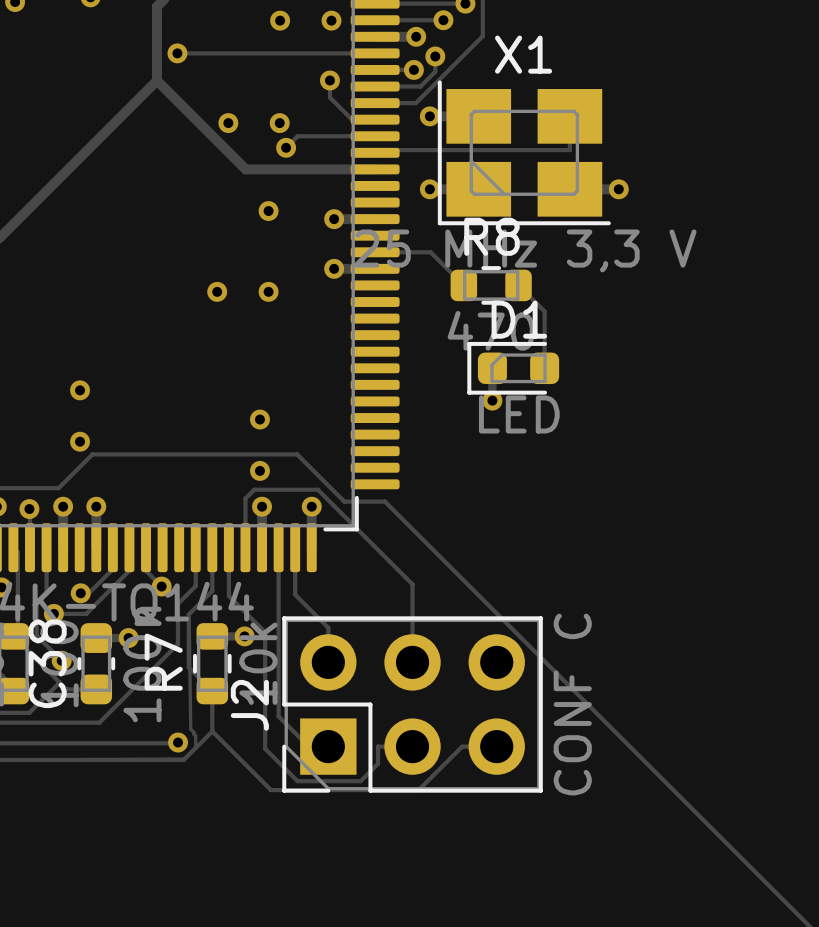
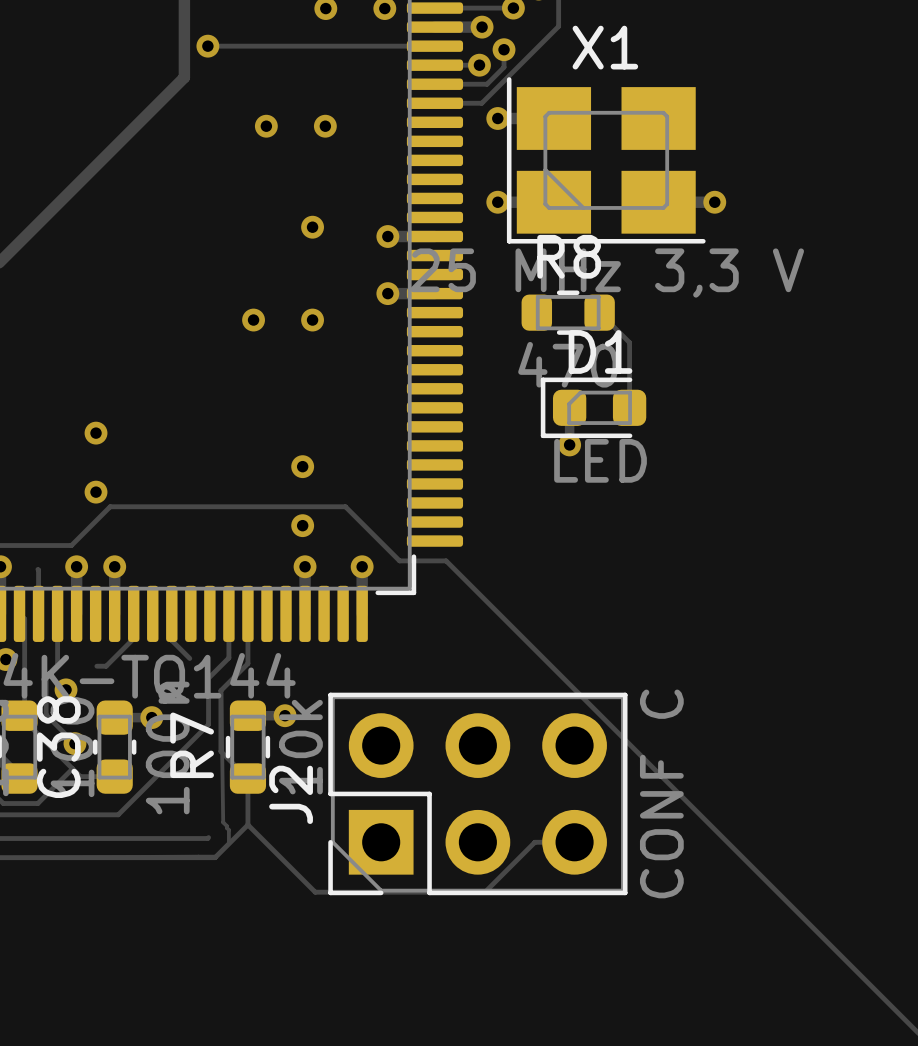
track: (156, 80) (245, 169) (375, 169) -> none
track: (329, 80) (329, 97) (352, 119) (375, 119) -> none
via: (329, 80) -> none
track: (569, 116) (569, 150) (377, 150) (375, 152) -> none
track: (375, 136) (297, 136) (286, 147) -> none
via: (286, 147) -> none
track: (375, 252) (430, 252) (463, 285) -> none
via: (29, 509) -> none
track: (129, 547) (129, 570) (86, 613) (53, 613) -> none
track: (228, 547) (228, 596) (265, 632) (265, 748) (297, 781) (360, 781) (377, 763) (377, 746) (412, 746) -> none
track: (245, 547) (245, 498) (254, 489) (317, 489) (412, 584) (412, 662) -> none
track: (278, 547) (278, 716) (308, 746) (328, 746) -> none
track: (295, 547) (295, 594) (328, 627) (328, 662) -> none
via: (161, 586) -> none
via: (80, 593) -> none
via: (178, 742) -> none

